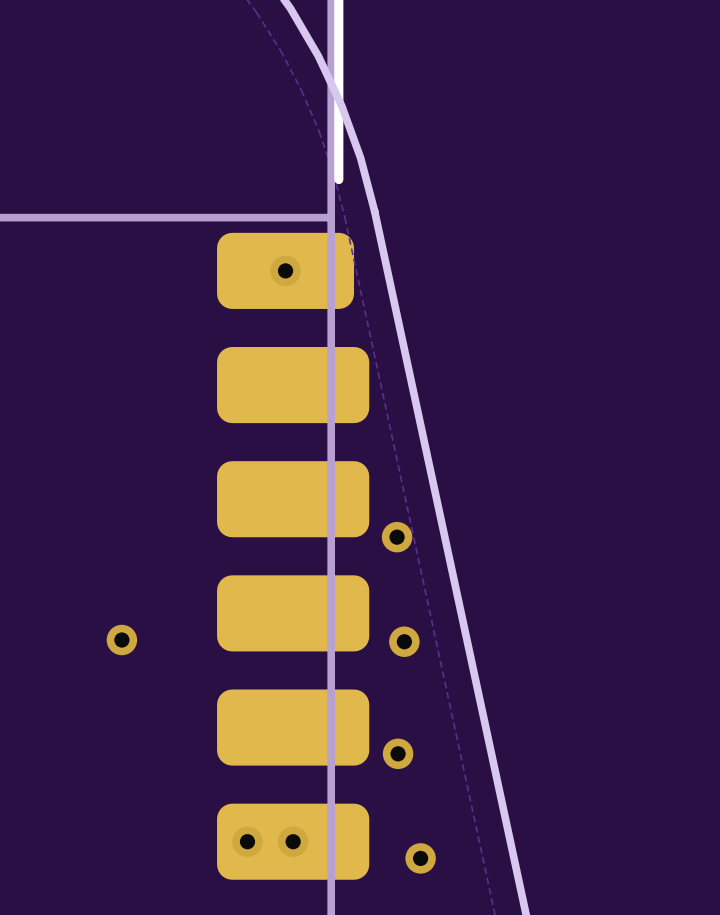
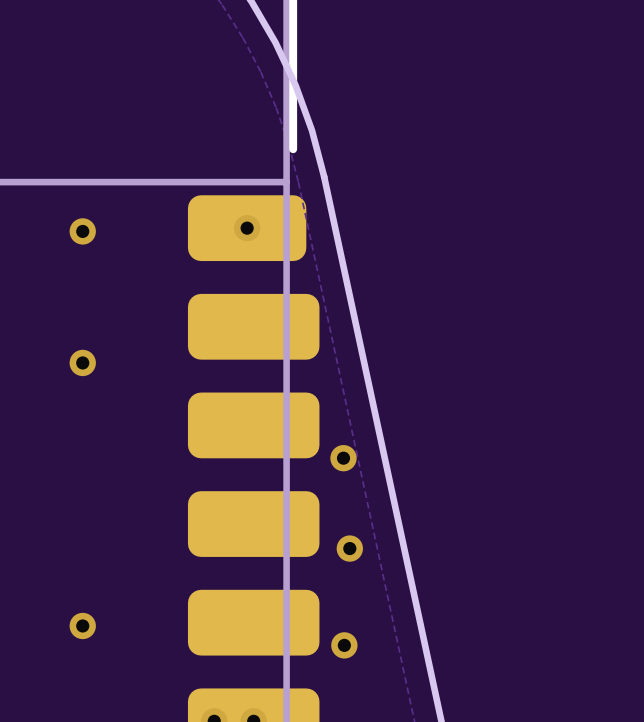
via: none -> (82, 231)
via: none -> (82, 362)
via: (121, 640) -> none
via: none -> (82, 625)

